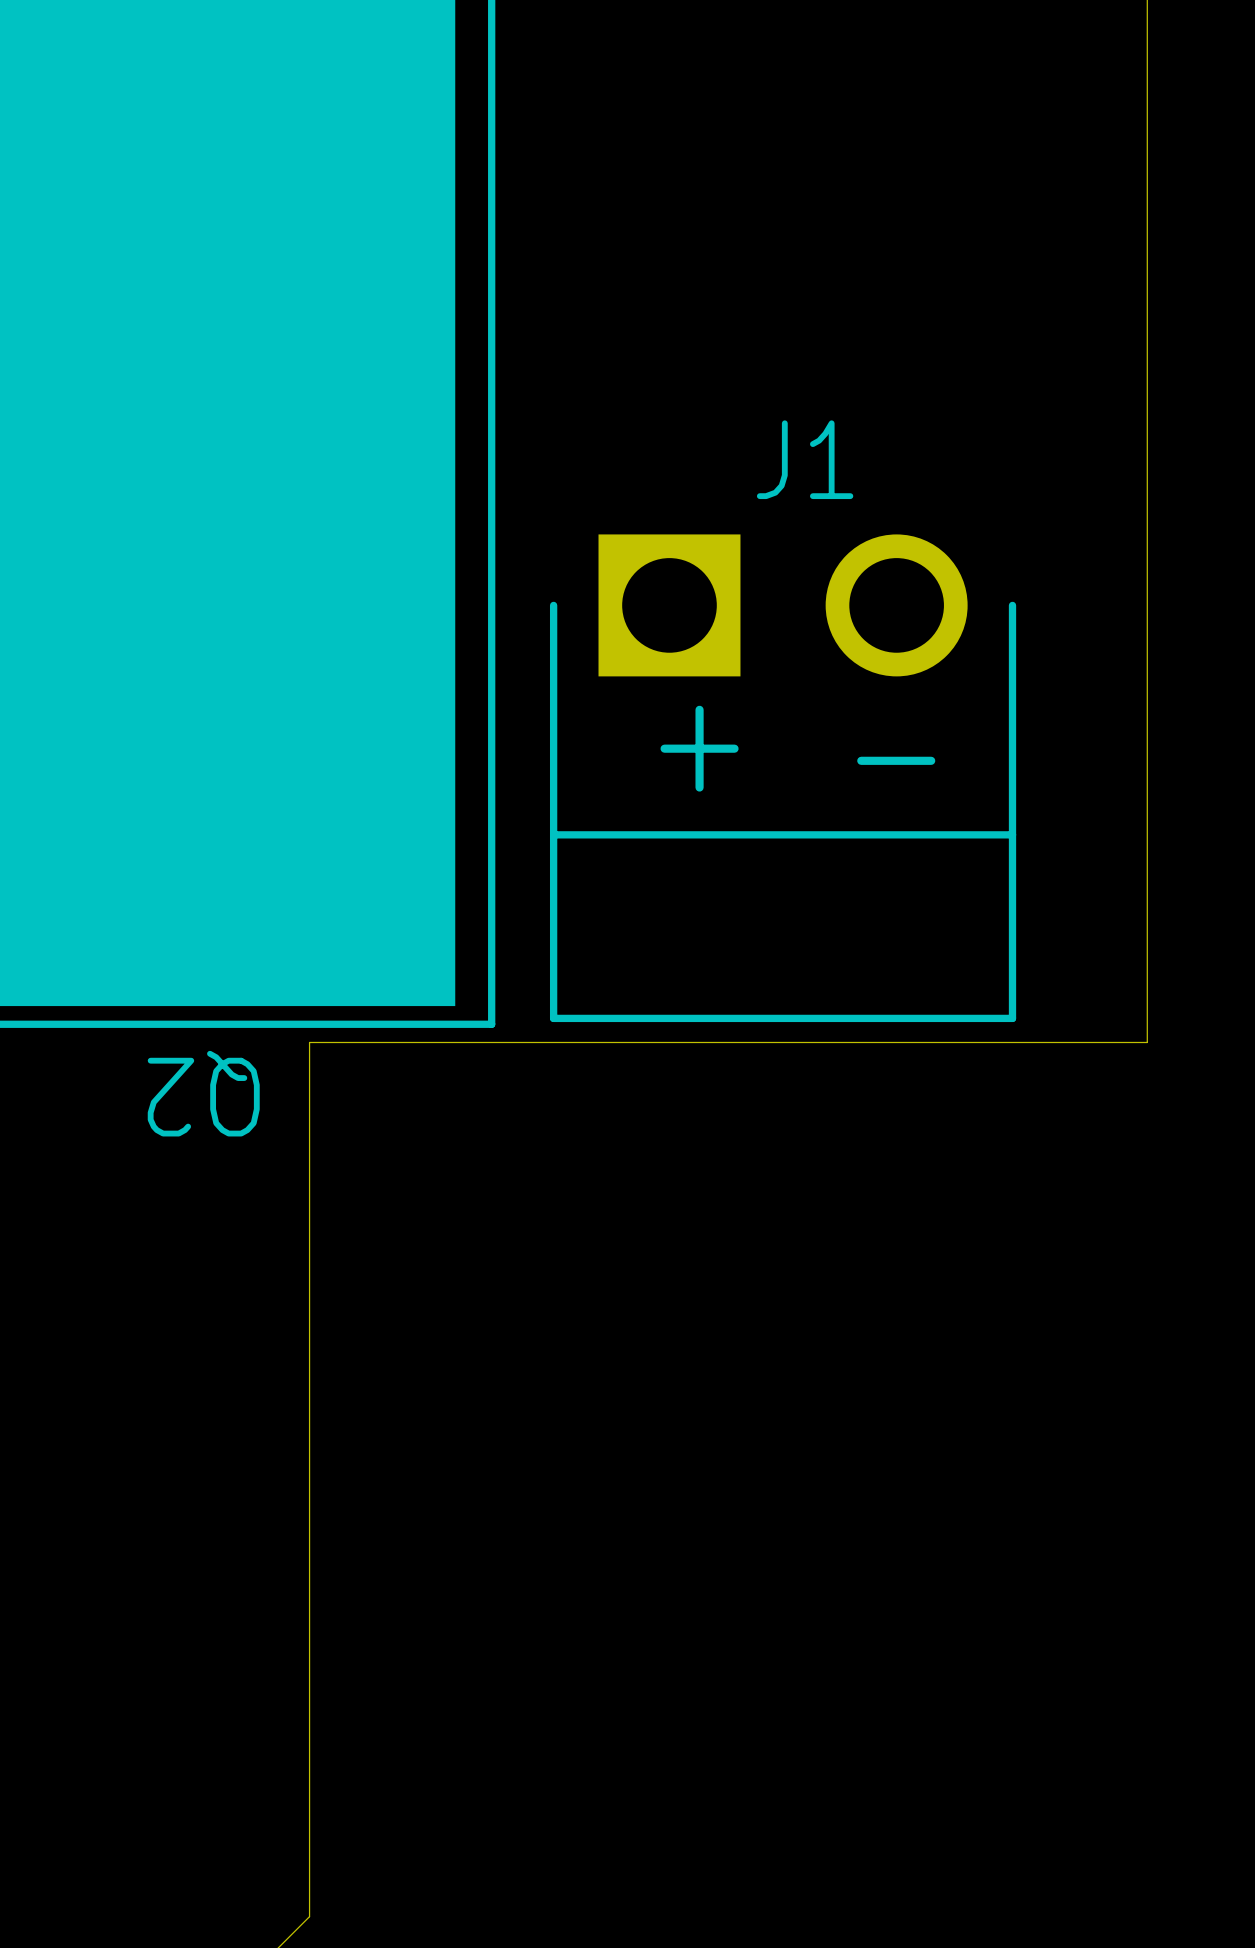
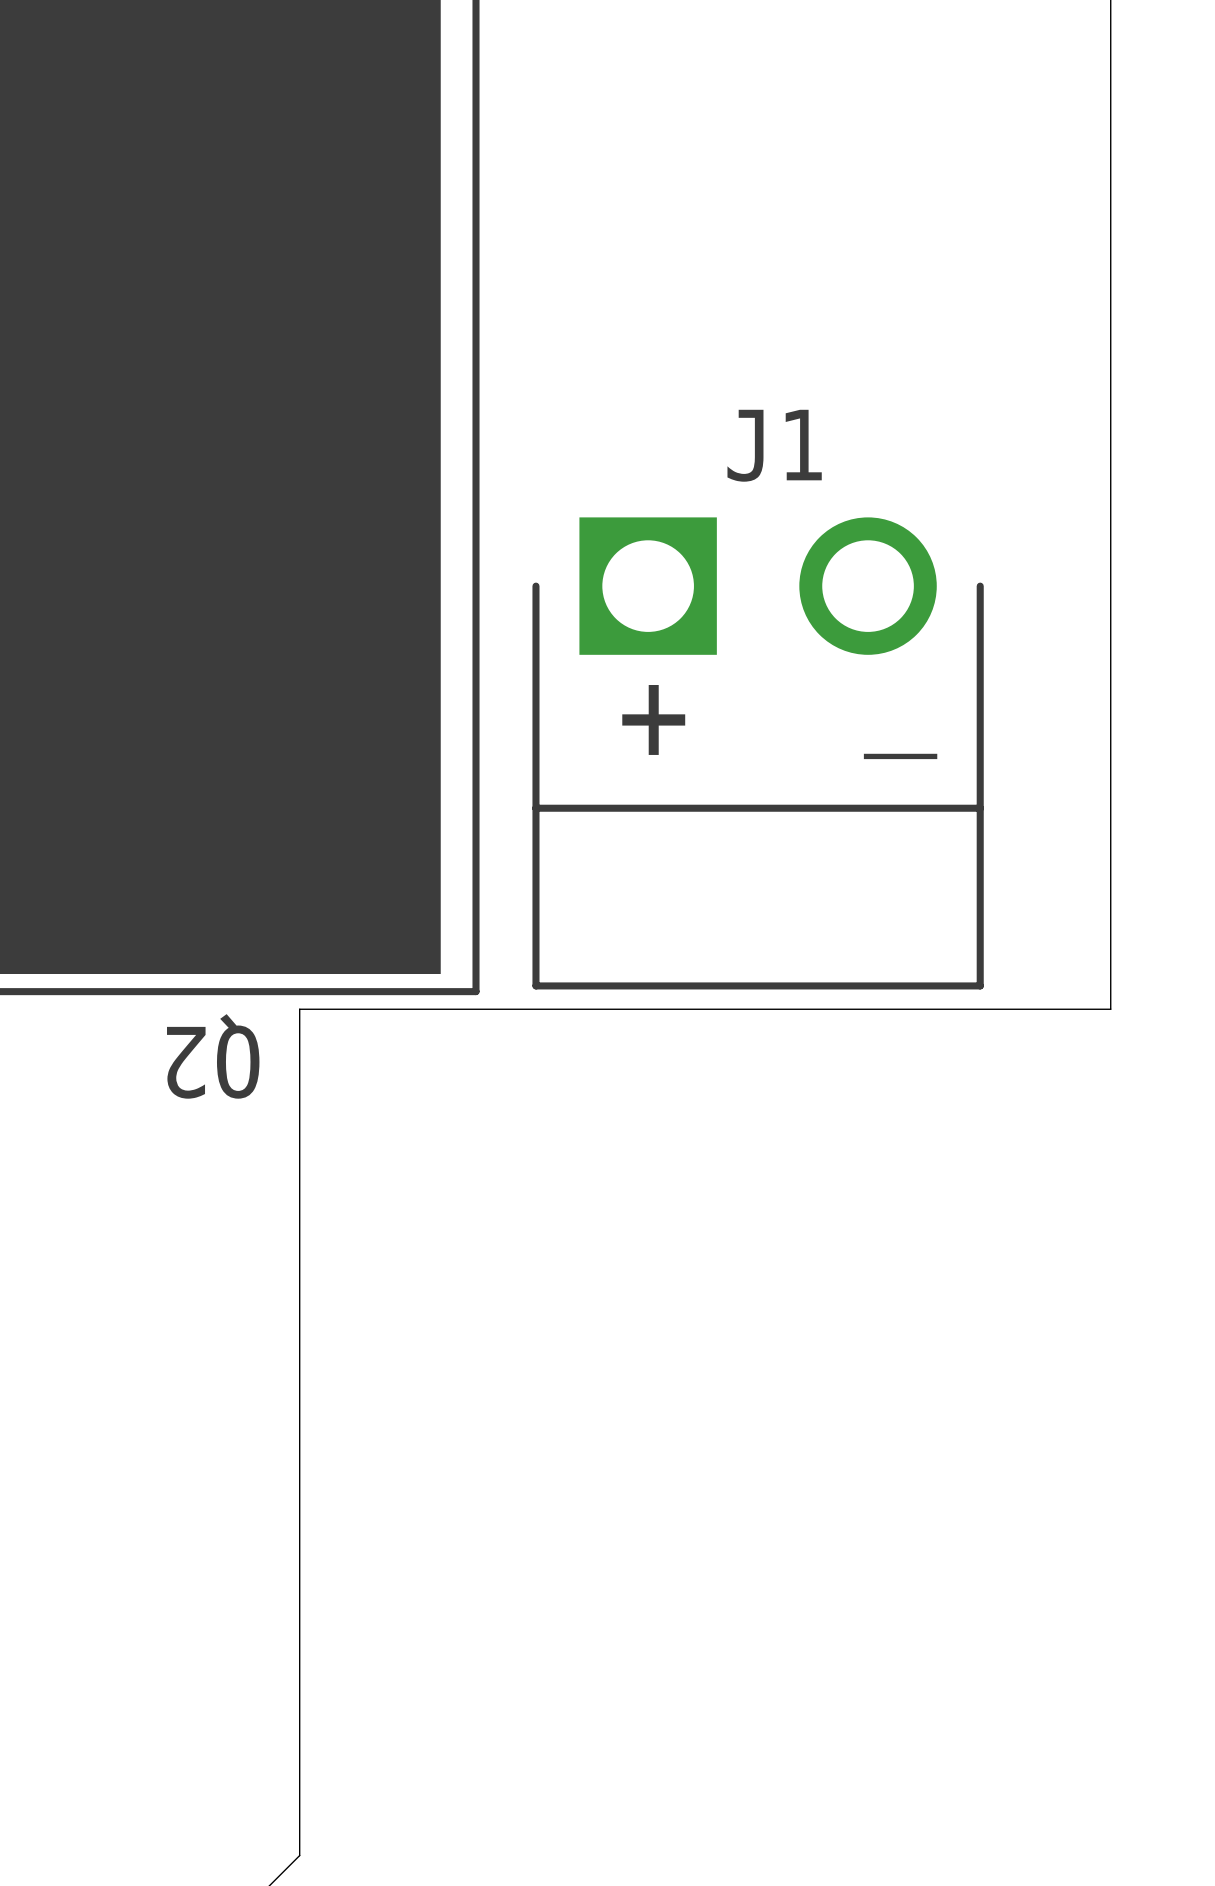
text position: _ (896, 760) -> _ (900, 756)

